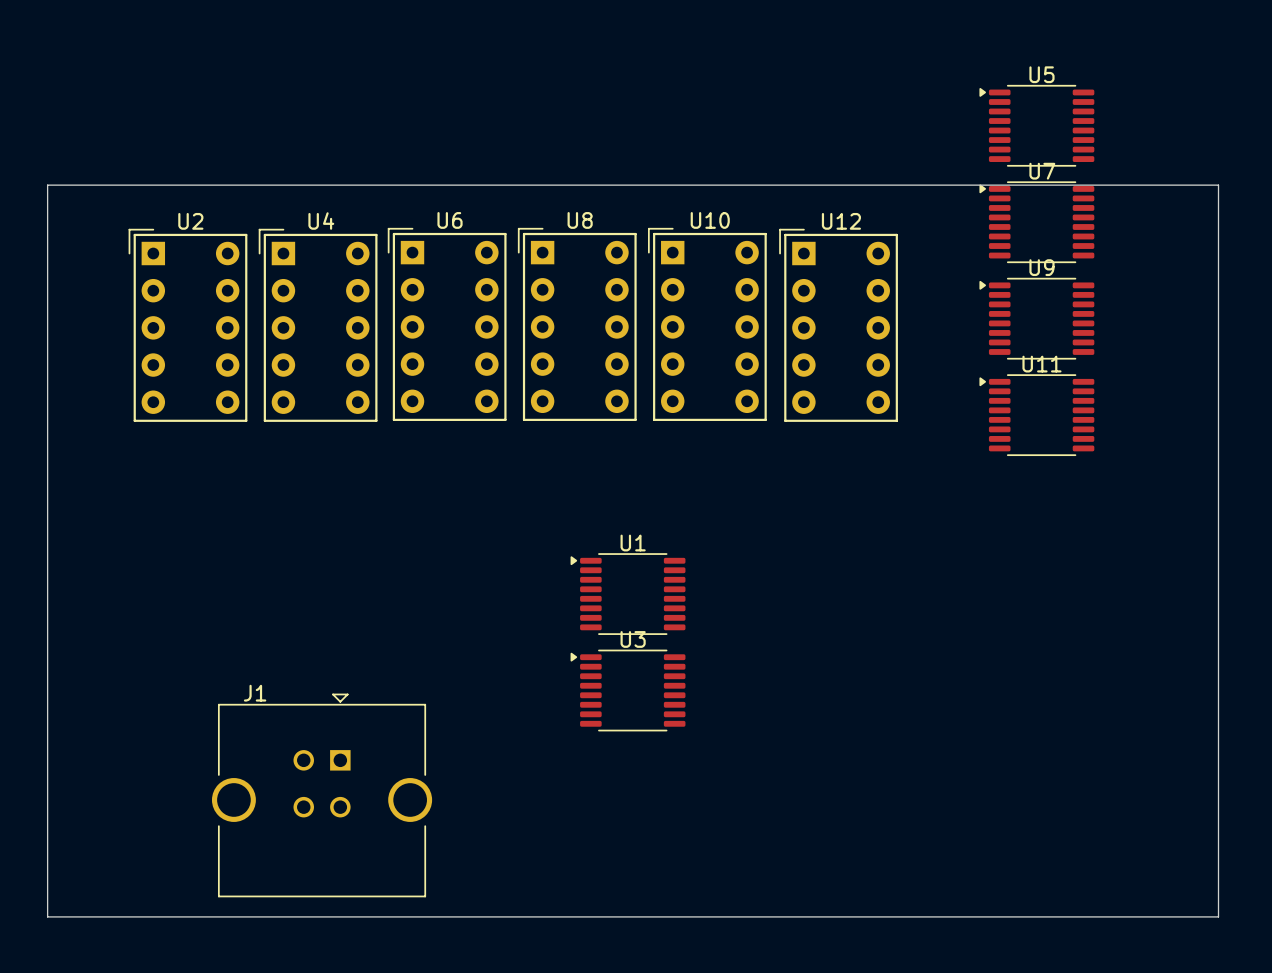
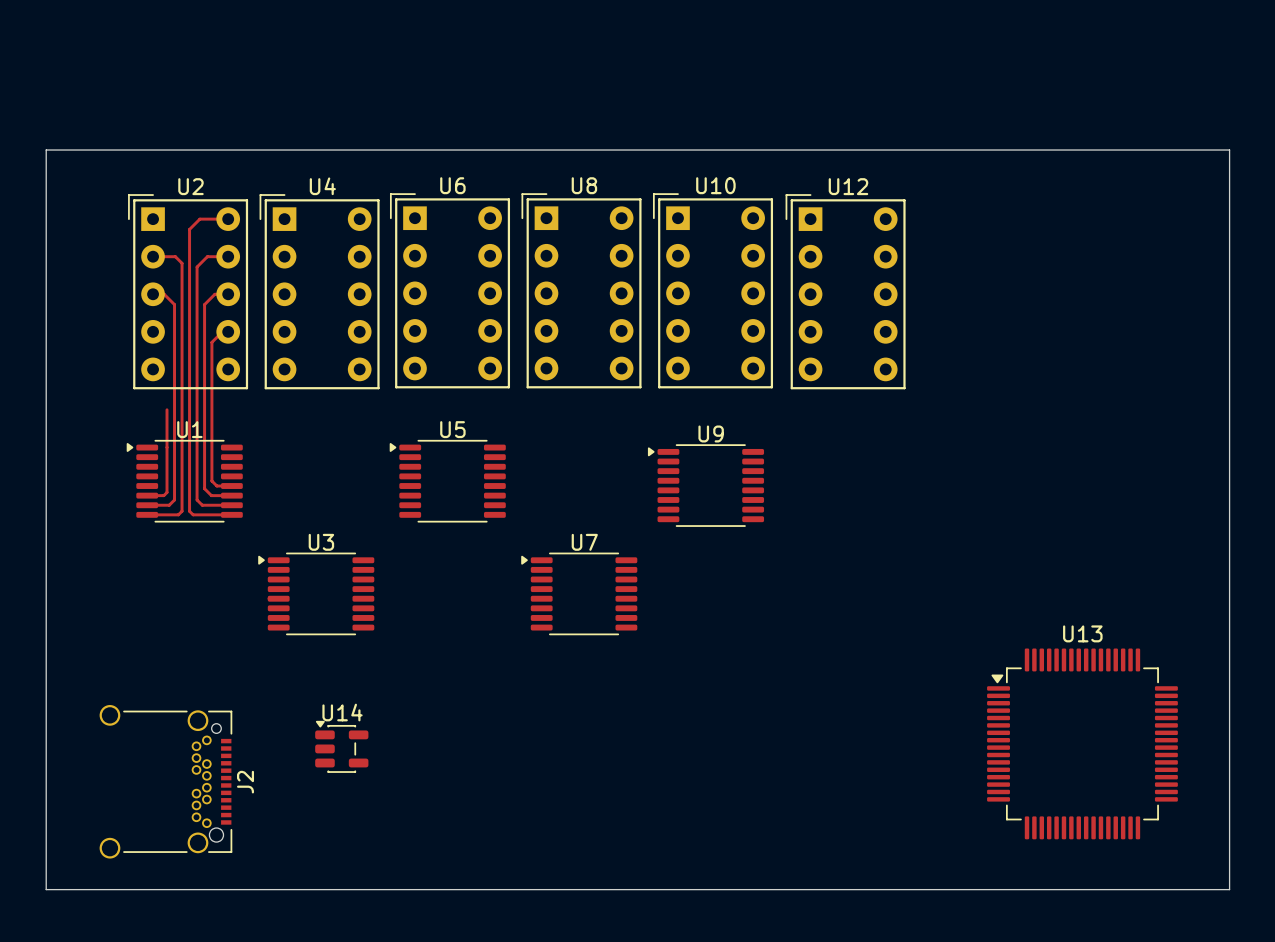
U5 position: (1036, 125) -> (447, 481)
U7 position: (1036, 222) -> (579, 593)
top track: none -> (228, 219) (199, 219) (189, 229) (189, 511) (193, 514) (231, 514)
top track: none -> (153, 256) (175, 256) (182, 263) (182, 511) (178, 514) (147, 514)
top track: none -> (228, 256) (207, 256) (197, 267) (197, 499) (202, 505) (231, 505)
U9 position: (1036, 318) -> (705, 485)
top track: none -> (153, 294) (164, 294) (174, 304) (174, 499) (169, 505) (147, 505)
top track: none -> (228, 294) (214, 294) (204, 304) (204, 488) (211, 495) (231, 495)
top track: none -> (222, 331) (211, 342) (211, 481) (216, 486) (231, 486)
U11: (1036, 415) -> none
top track: none -> (167, 409) (167, 492) (163, 495) (147, 495)
U1 position: (628, 594) -> (184, 481)
U3 position: (628, 690) -> (316, 593)
U13: none -> (1082, 743)
U14: none -> (341, 746)
J1: (322, 795) -> none
J2: none -> (165, 781)

